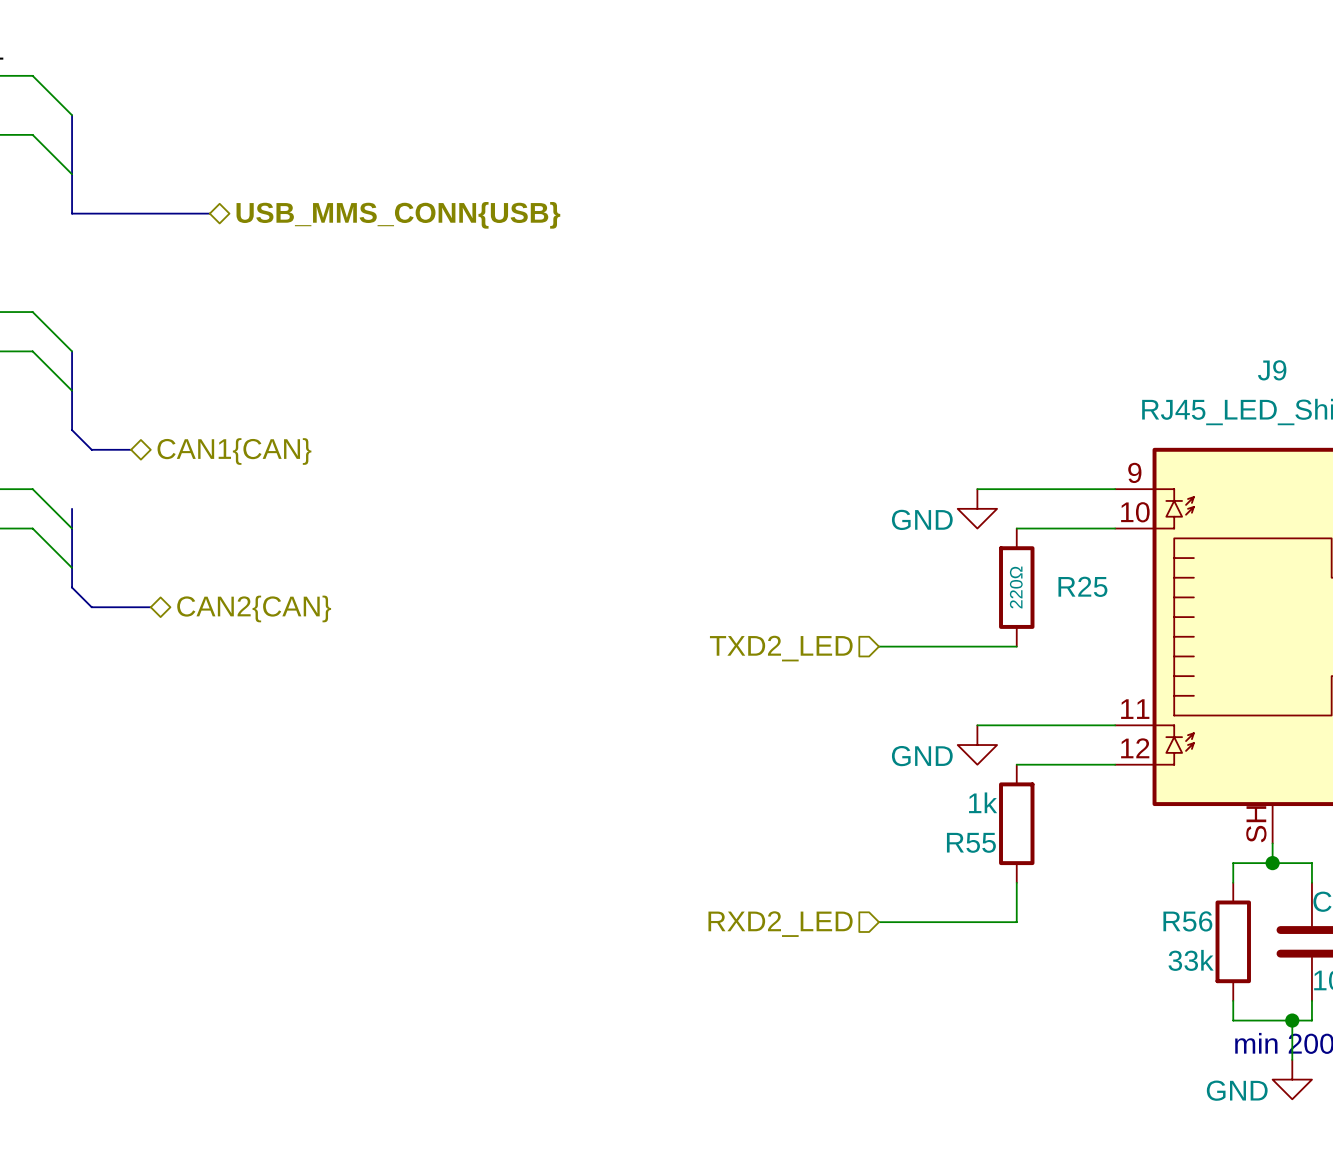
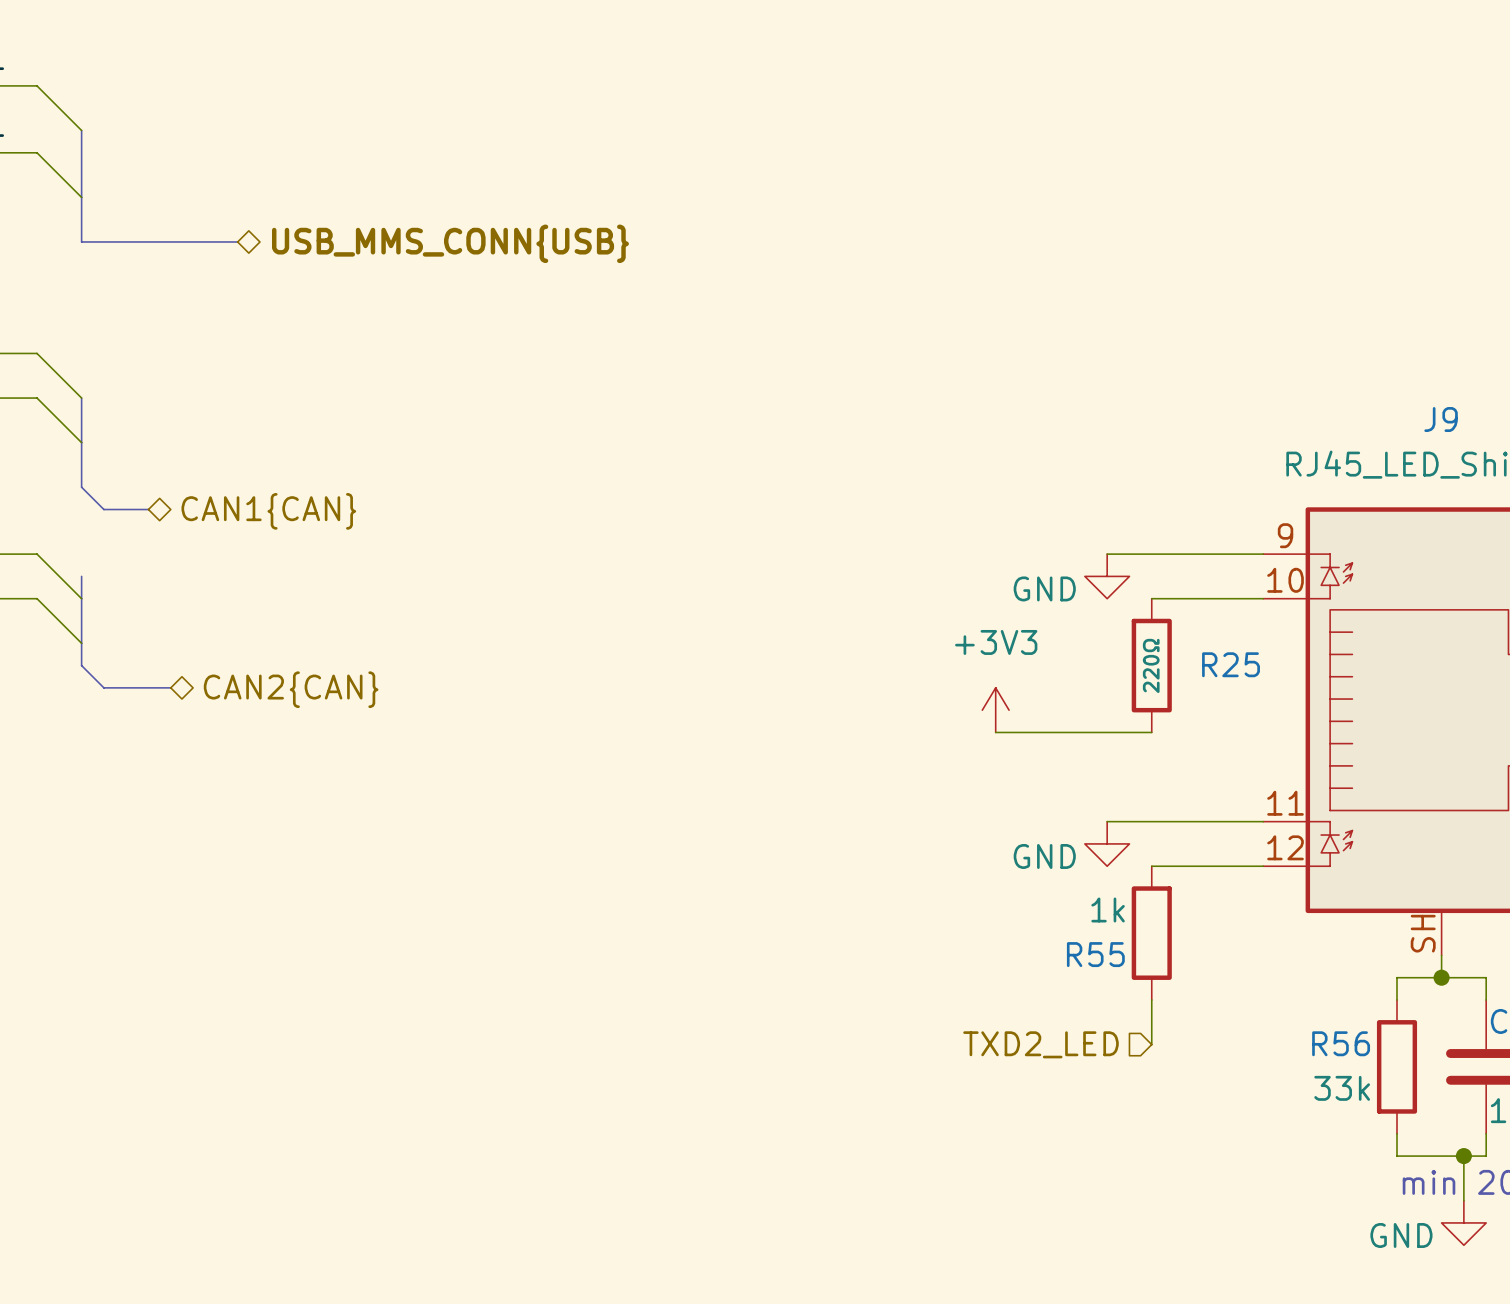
power symbol: none -> +3V3 (995, 710)
hierarchical label position: TXD2_LED (781, 648) -> TXD2_LED (1040, 1044)
wire: (878, 922) (1016, 922) -> none
hierarchical label: RXD2_LED (780, 924) -> none

